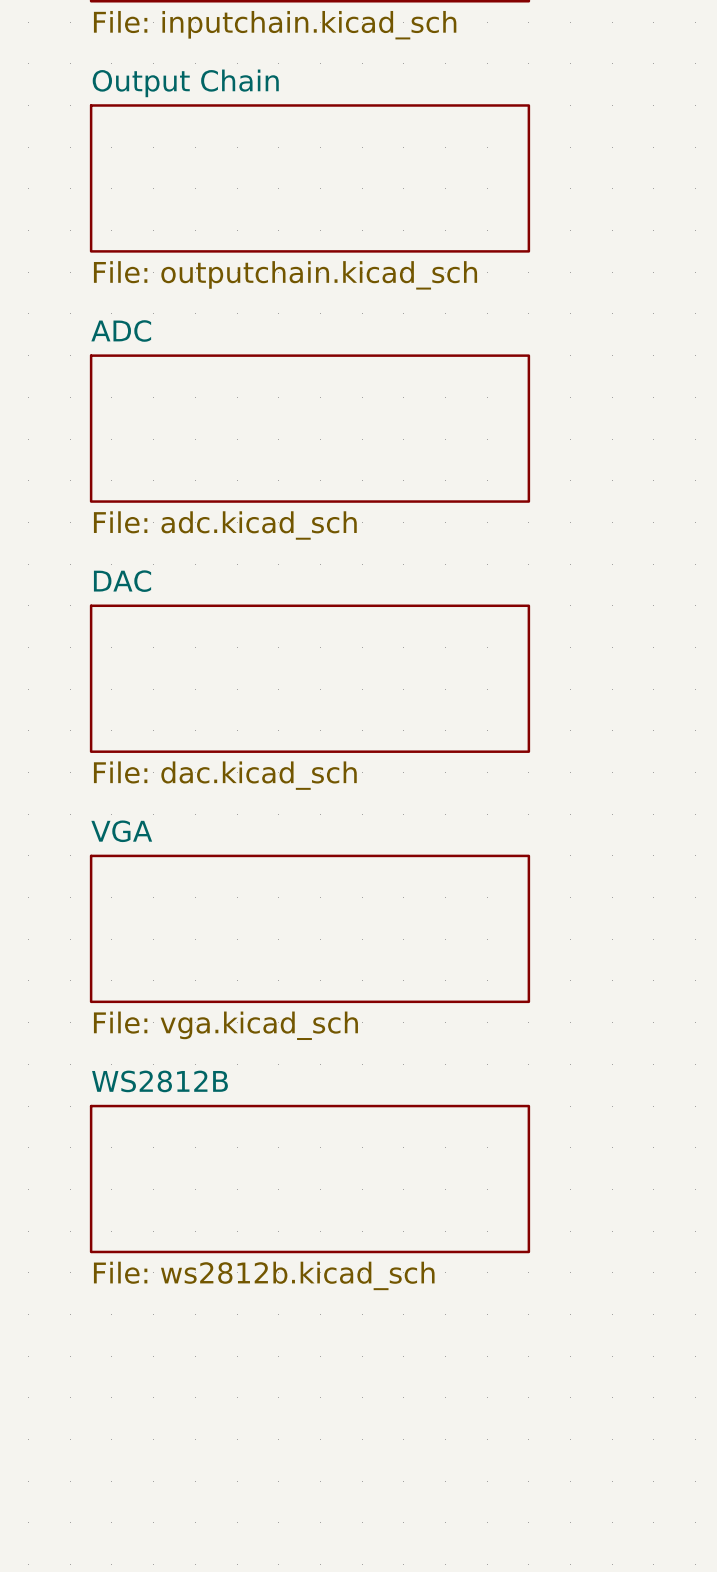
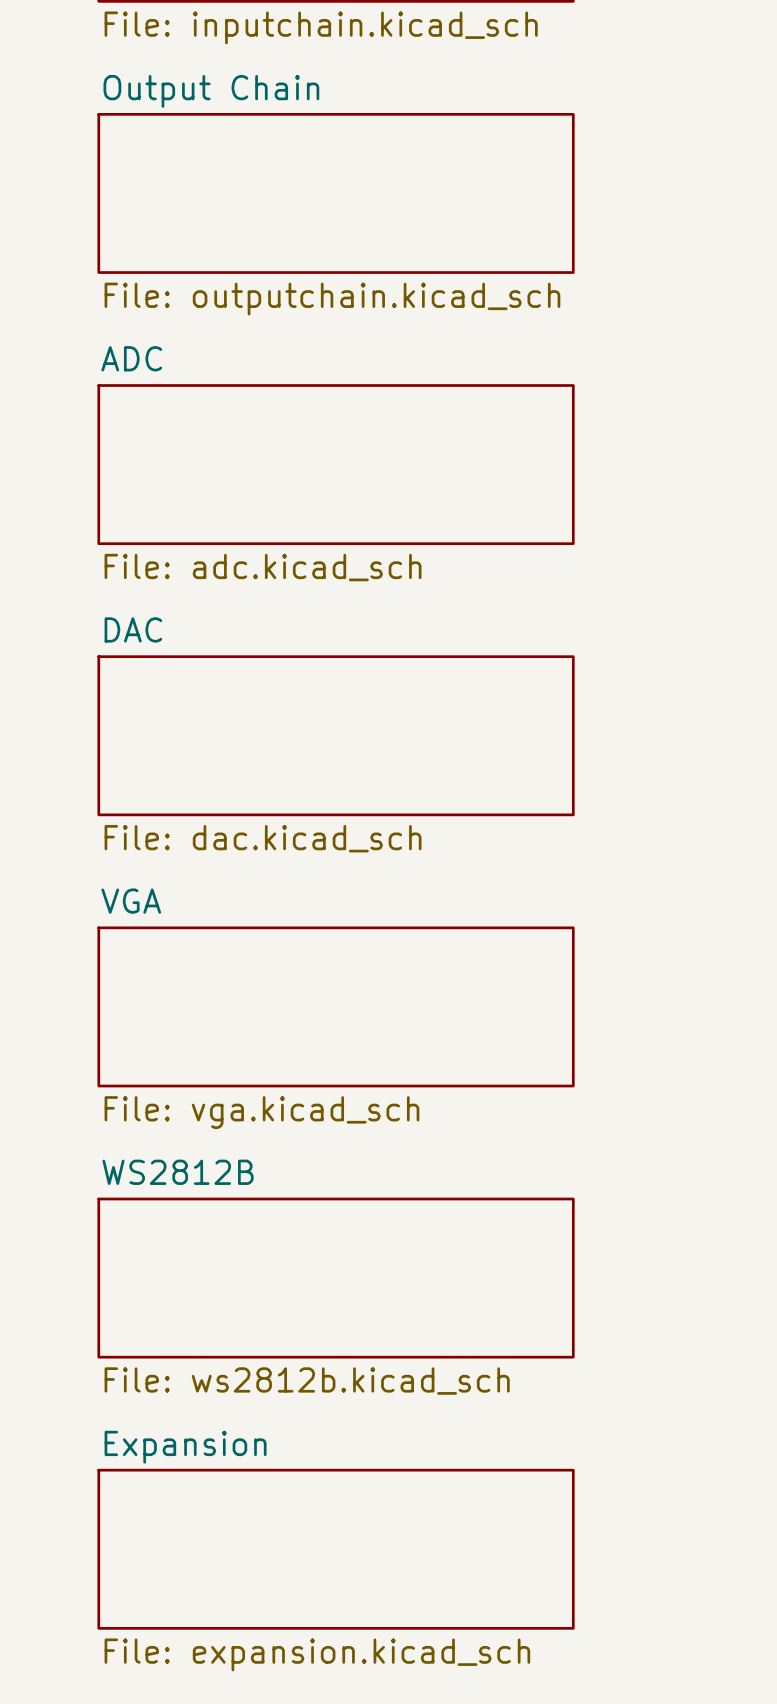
sheet Expansion: none -> File: expansion.kicad_sch (336, 1549)

